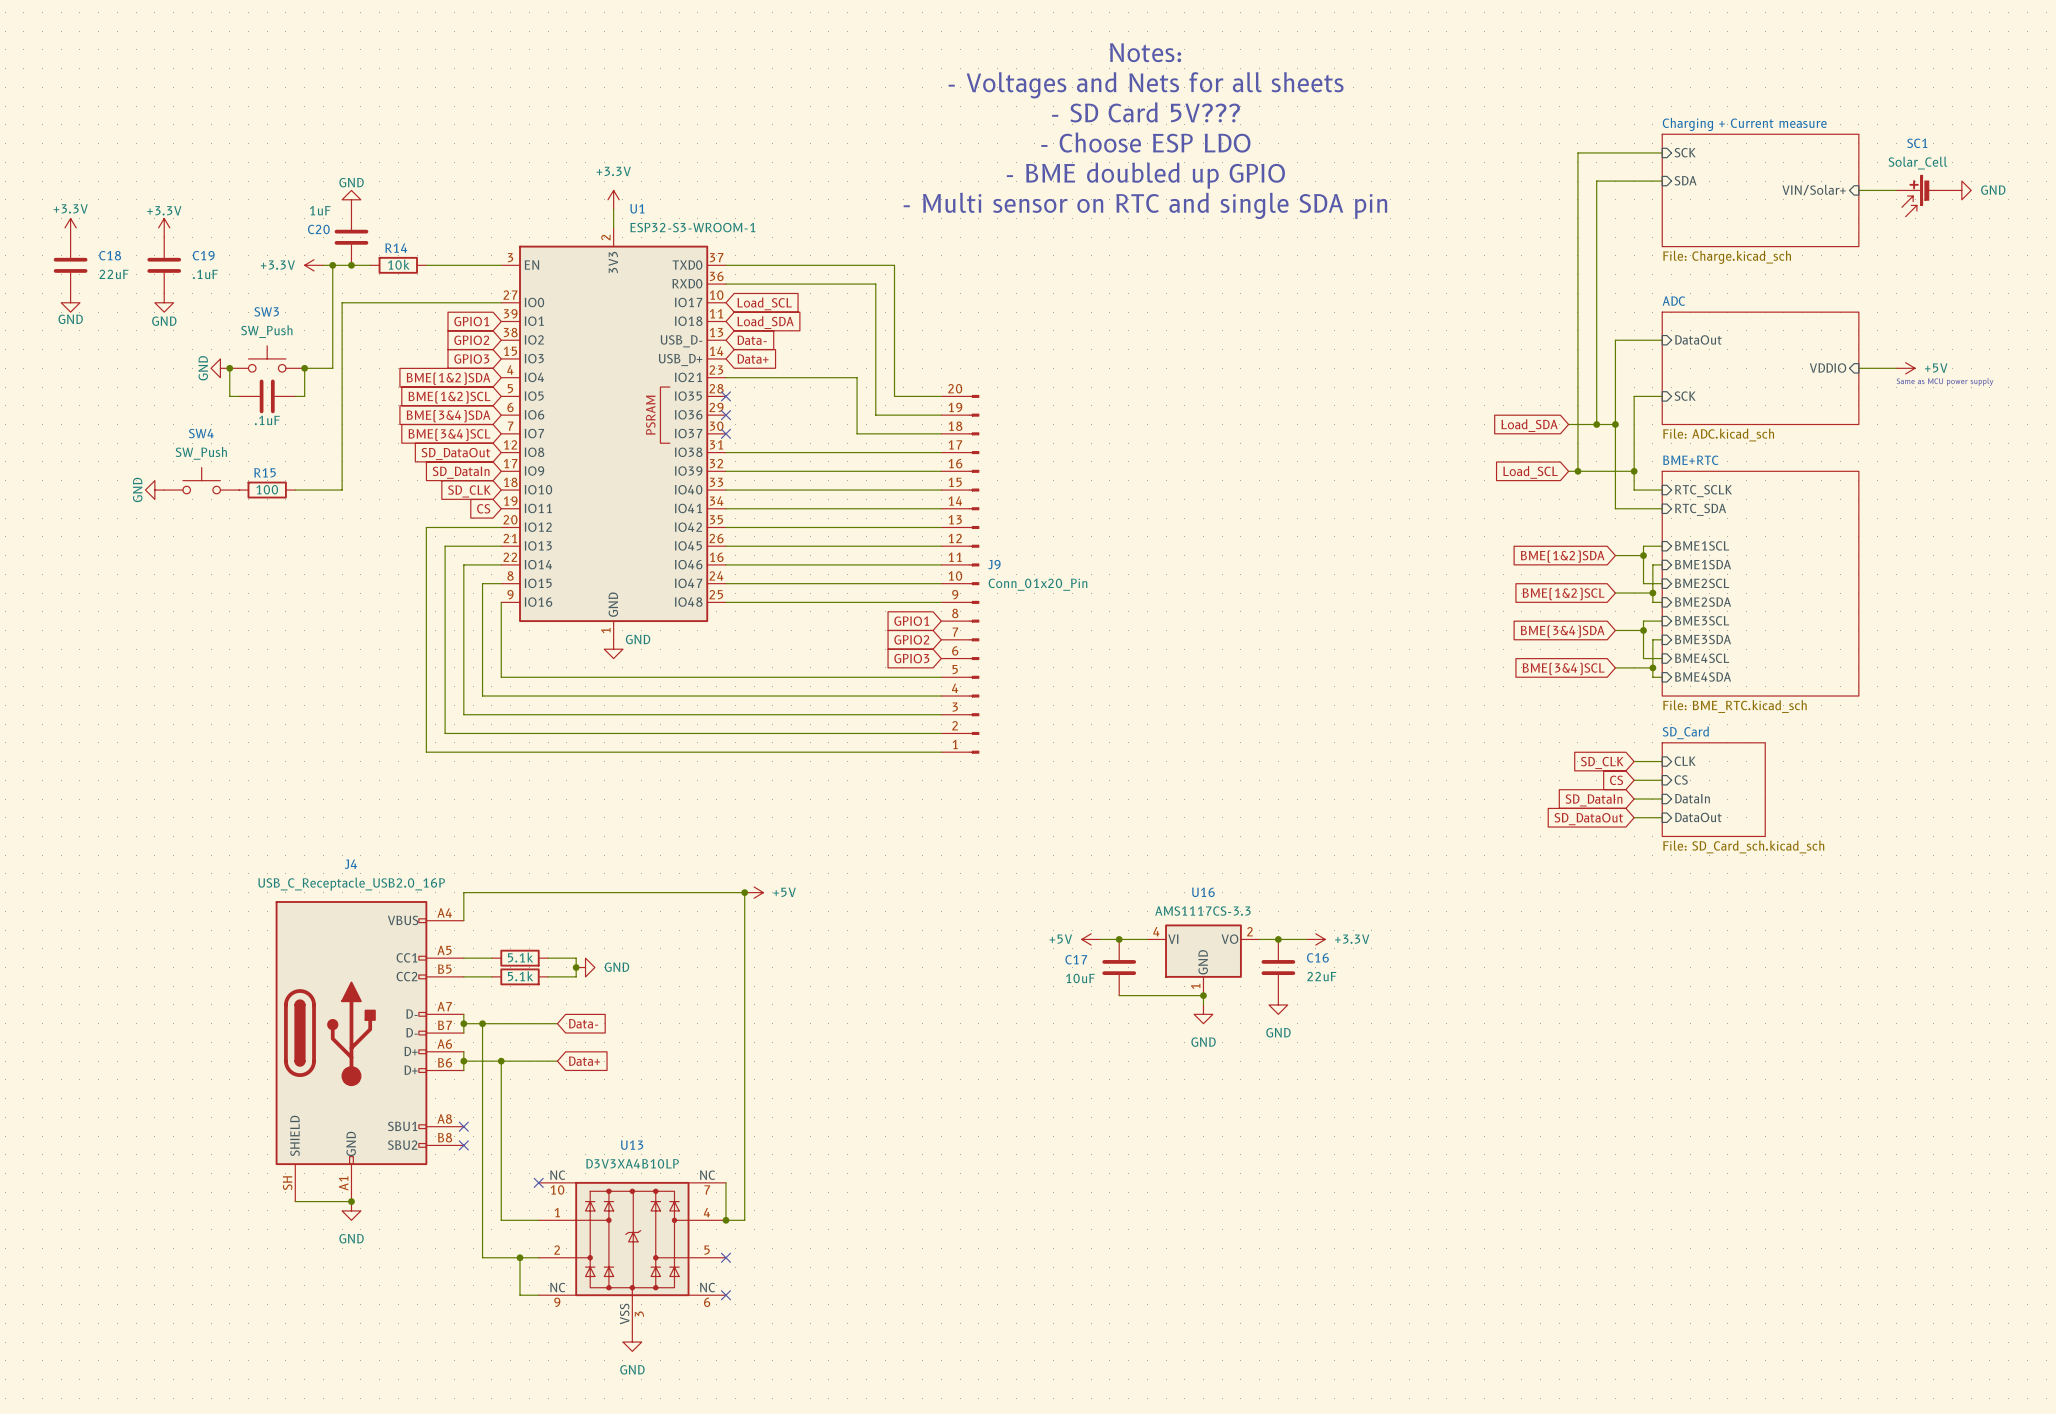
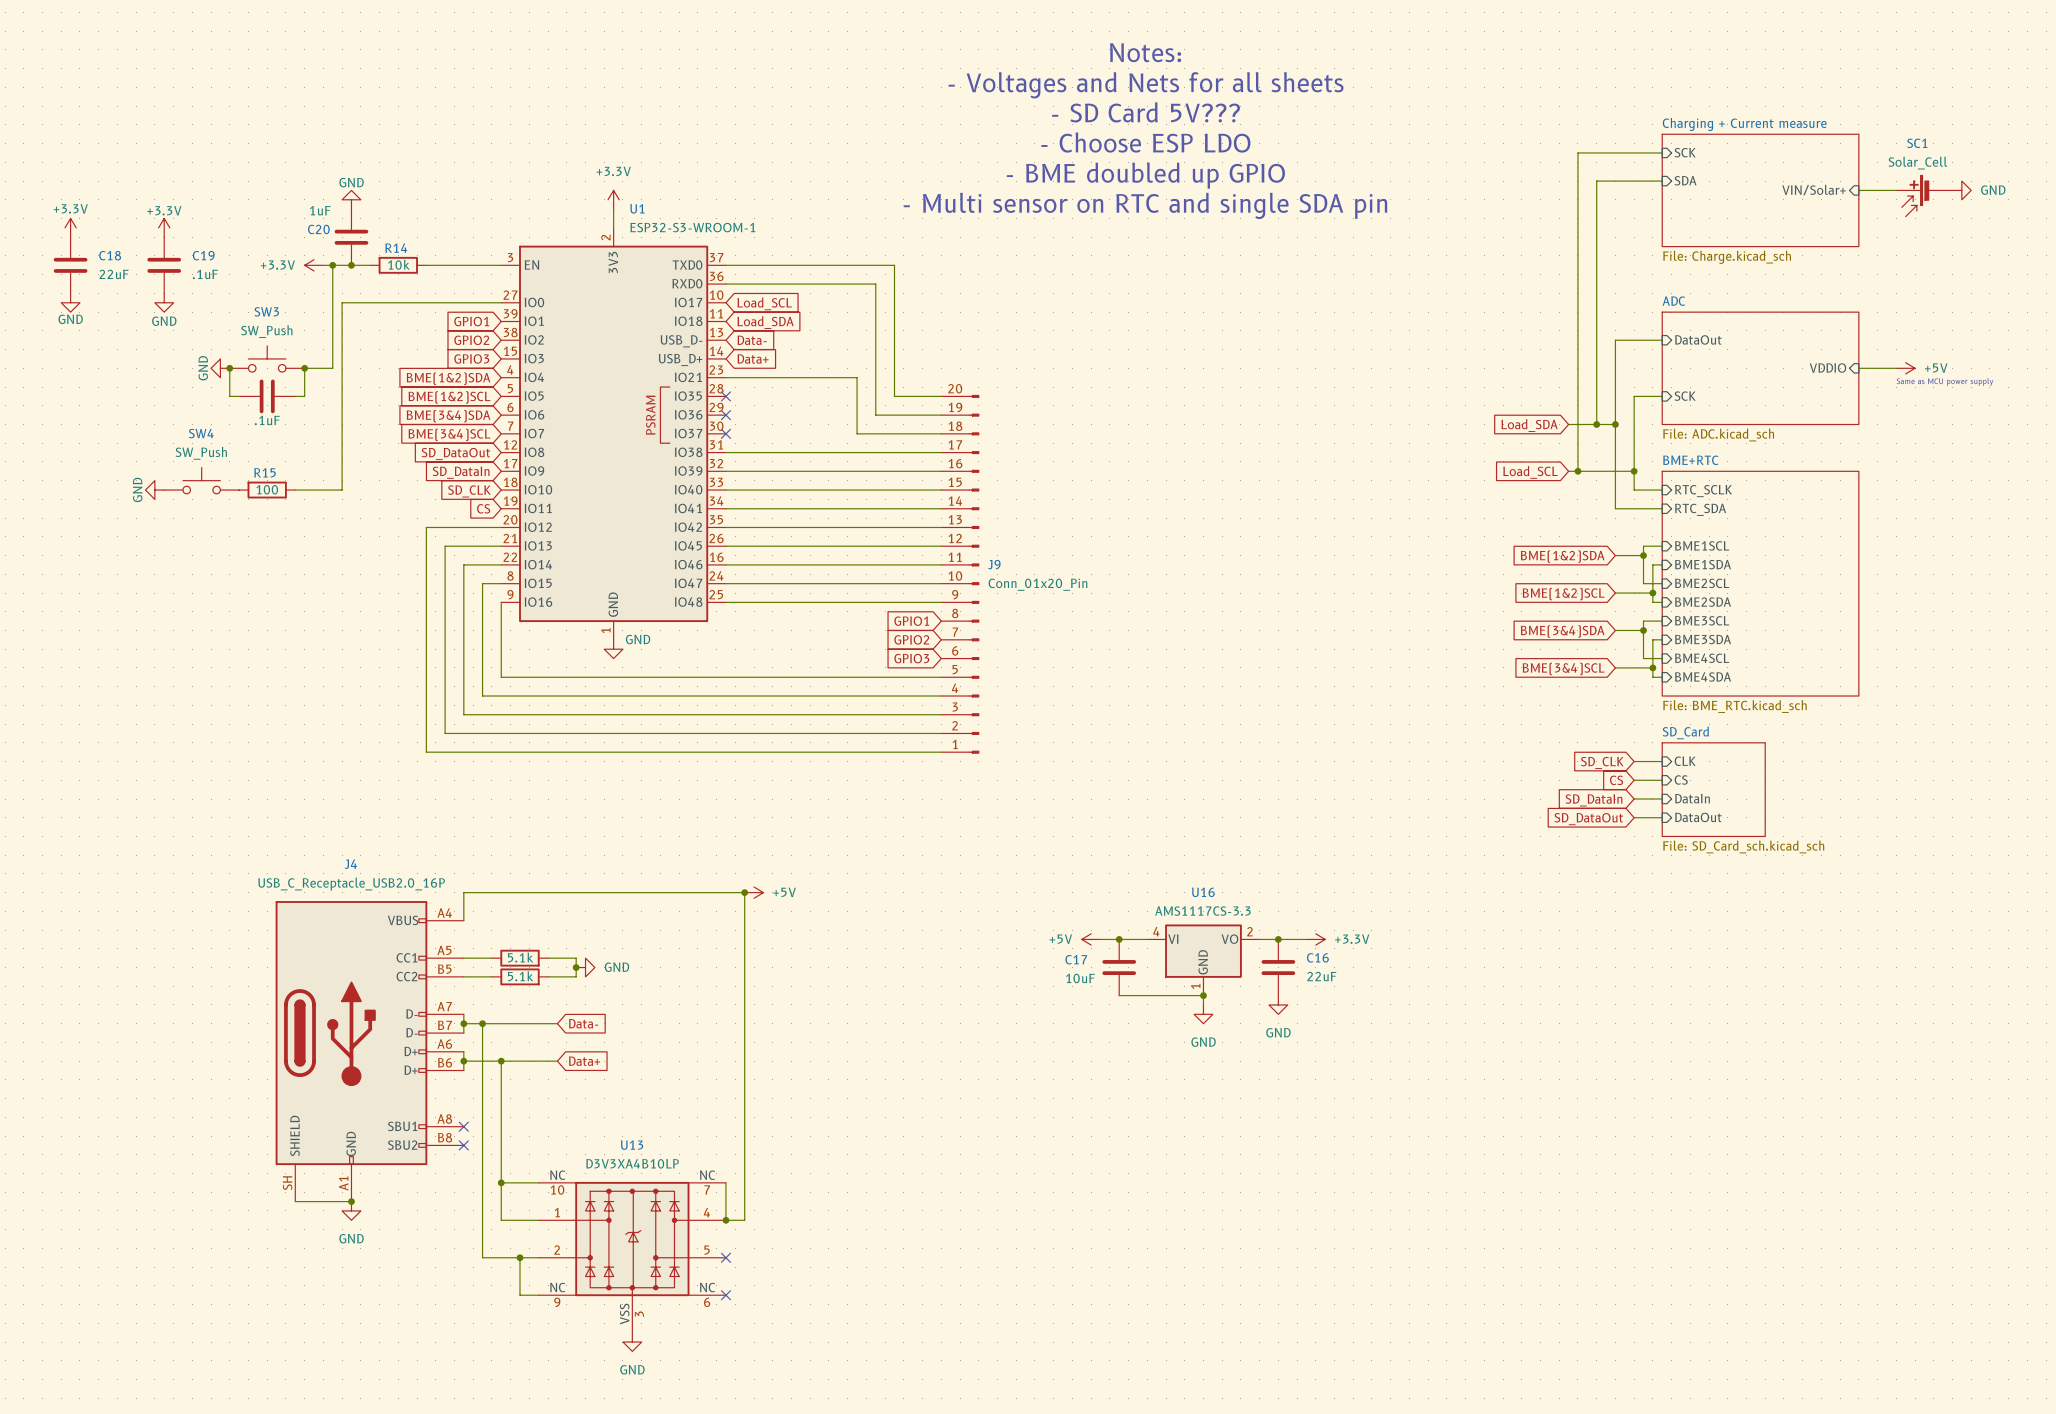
wire: none -> (501, 1182) (538, 1182)
junction: none -> (501, 1182)
no-connect mark: (538, 1182) -> none

